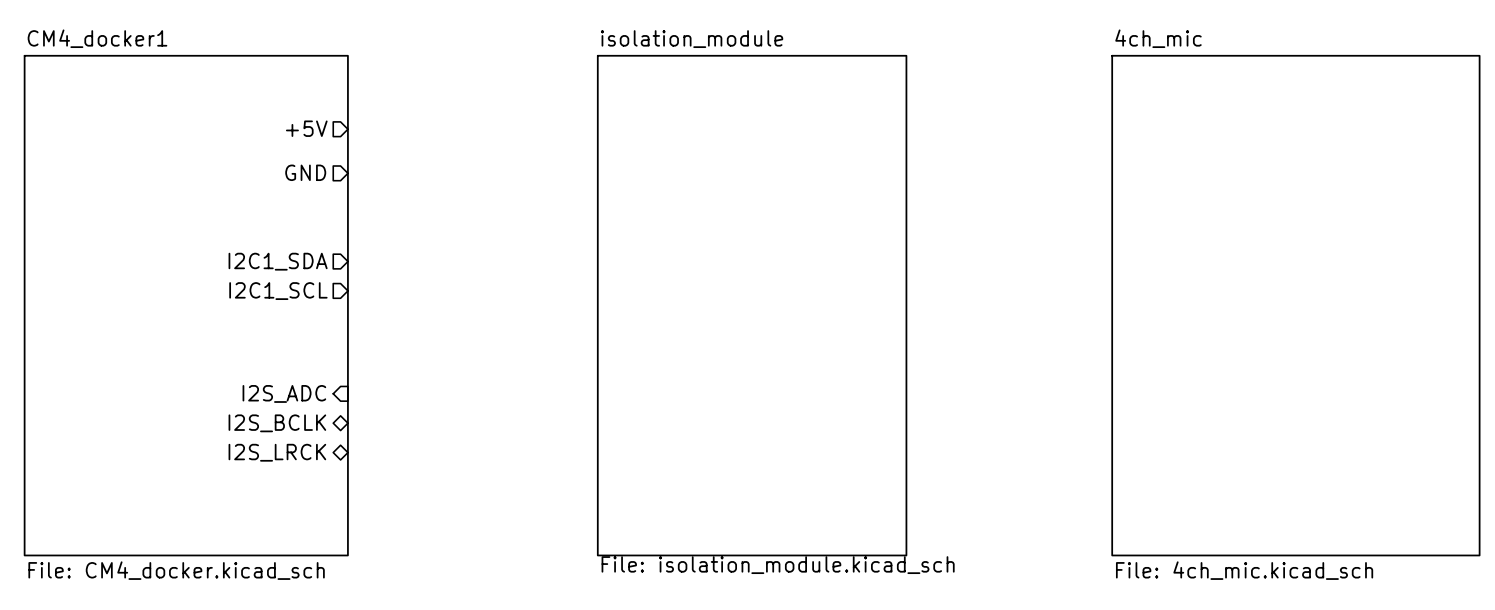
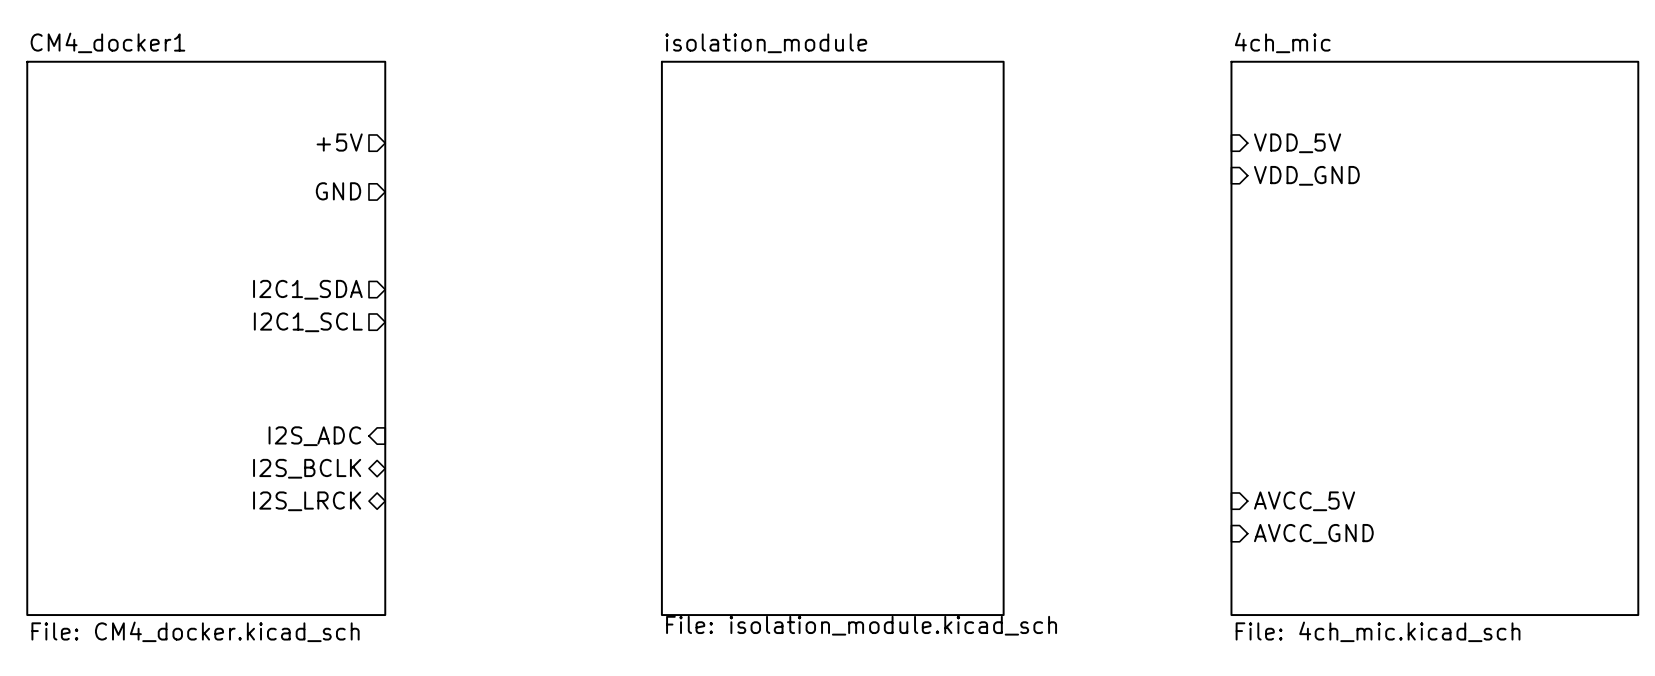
sheet pin: none -> VDD_5V (1297, 143)
sheet pin: none -> VDD_GND (1306, 175)
sheet pin: none -> AVCC_5V (1304, 501)
sheet pin: none -> AVCC_GND (1313, 533)

